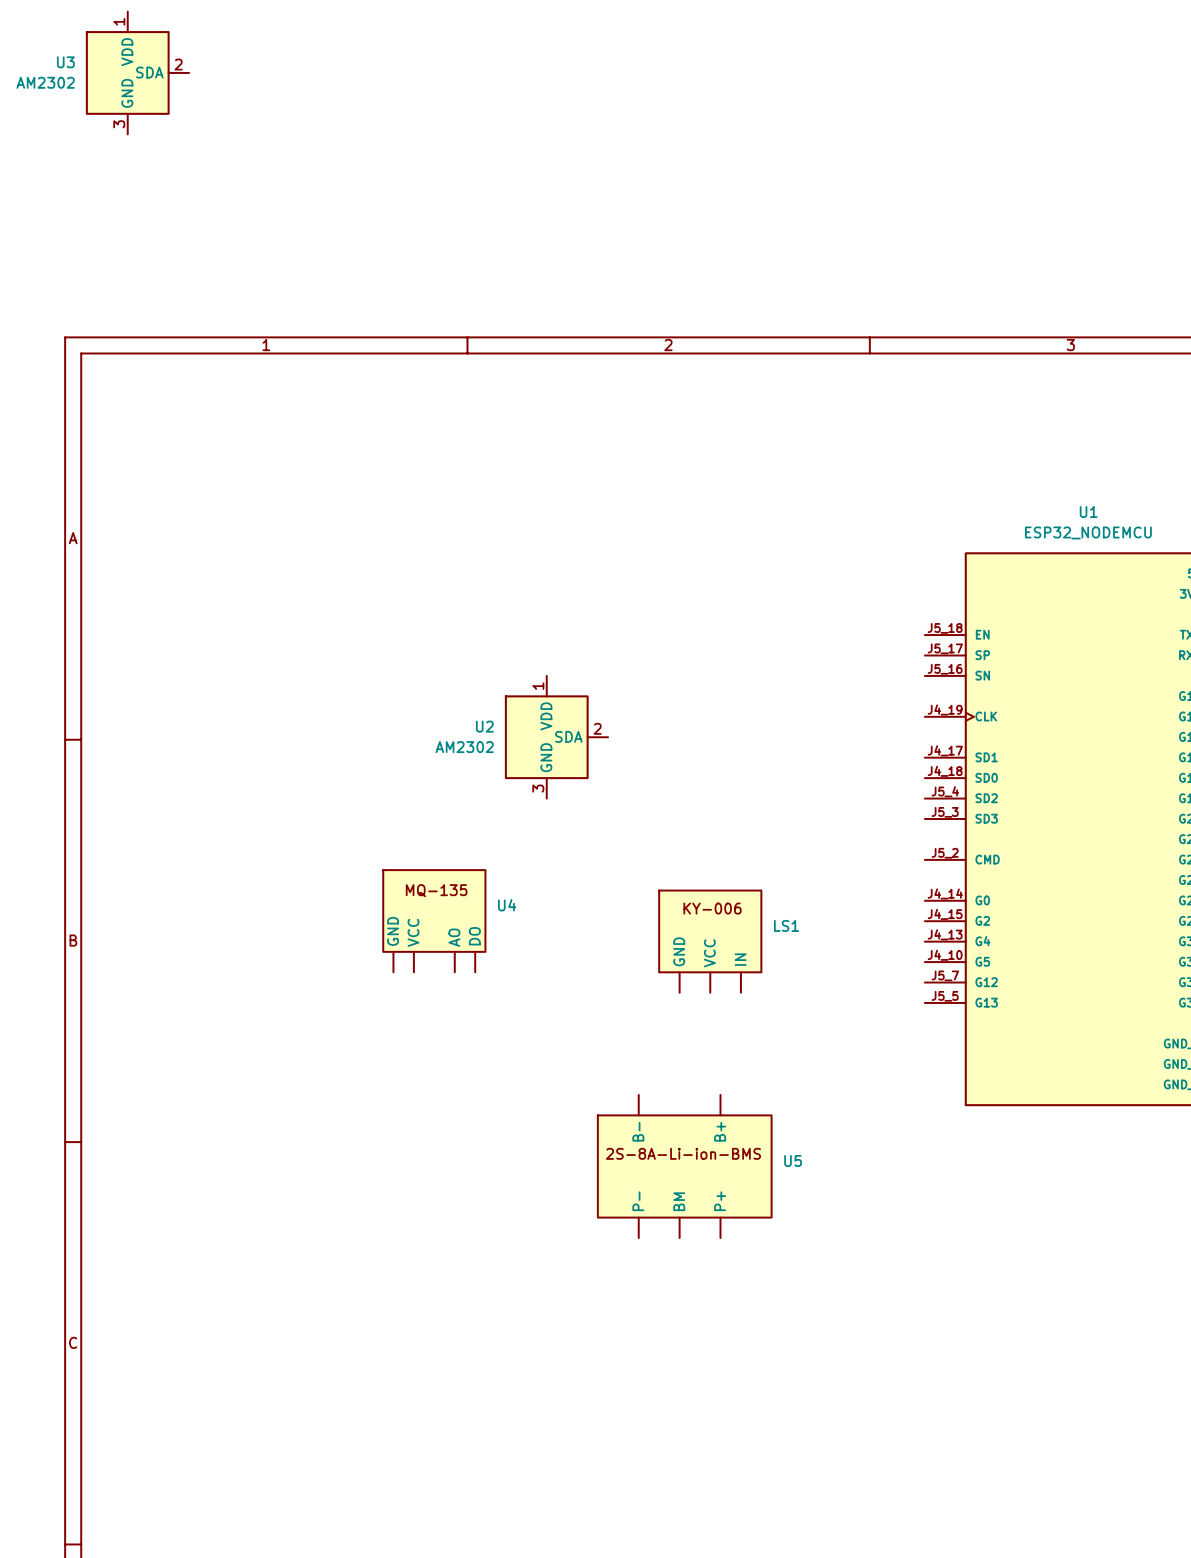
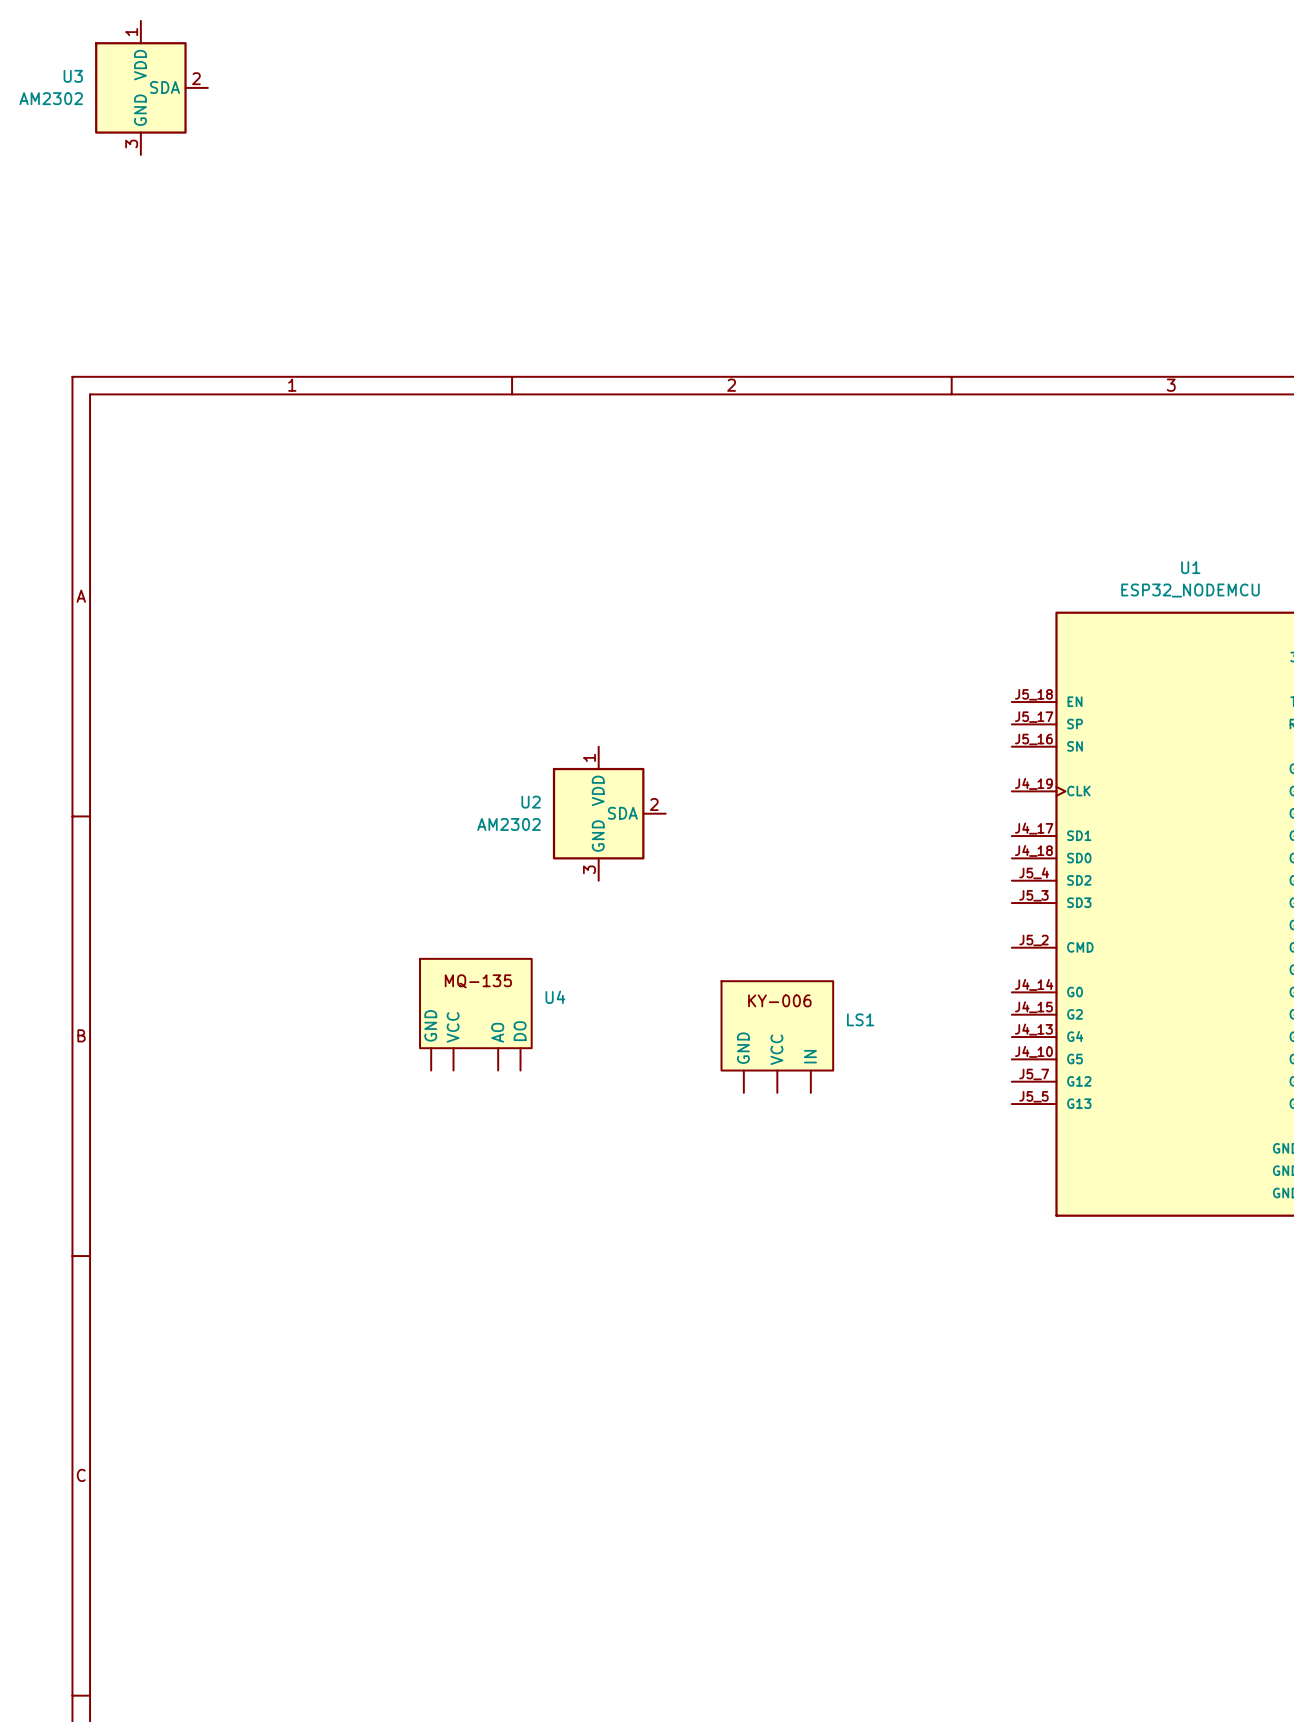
U5: (684, 1166) -> none

